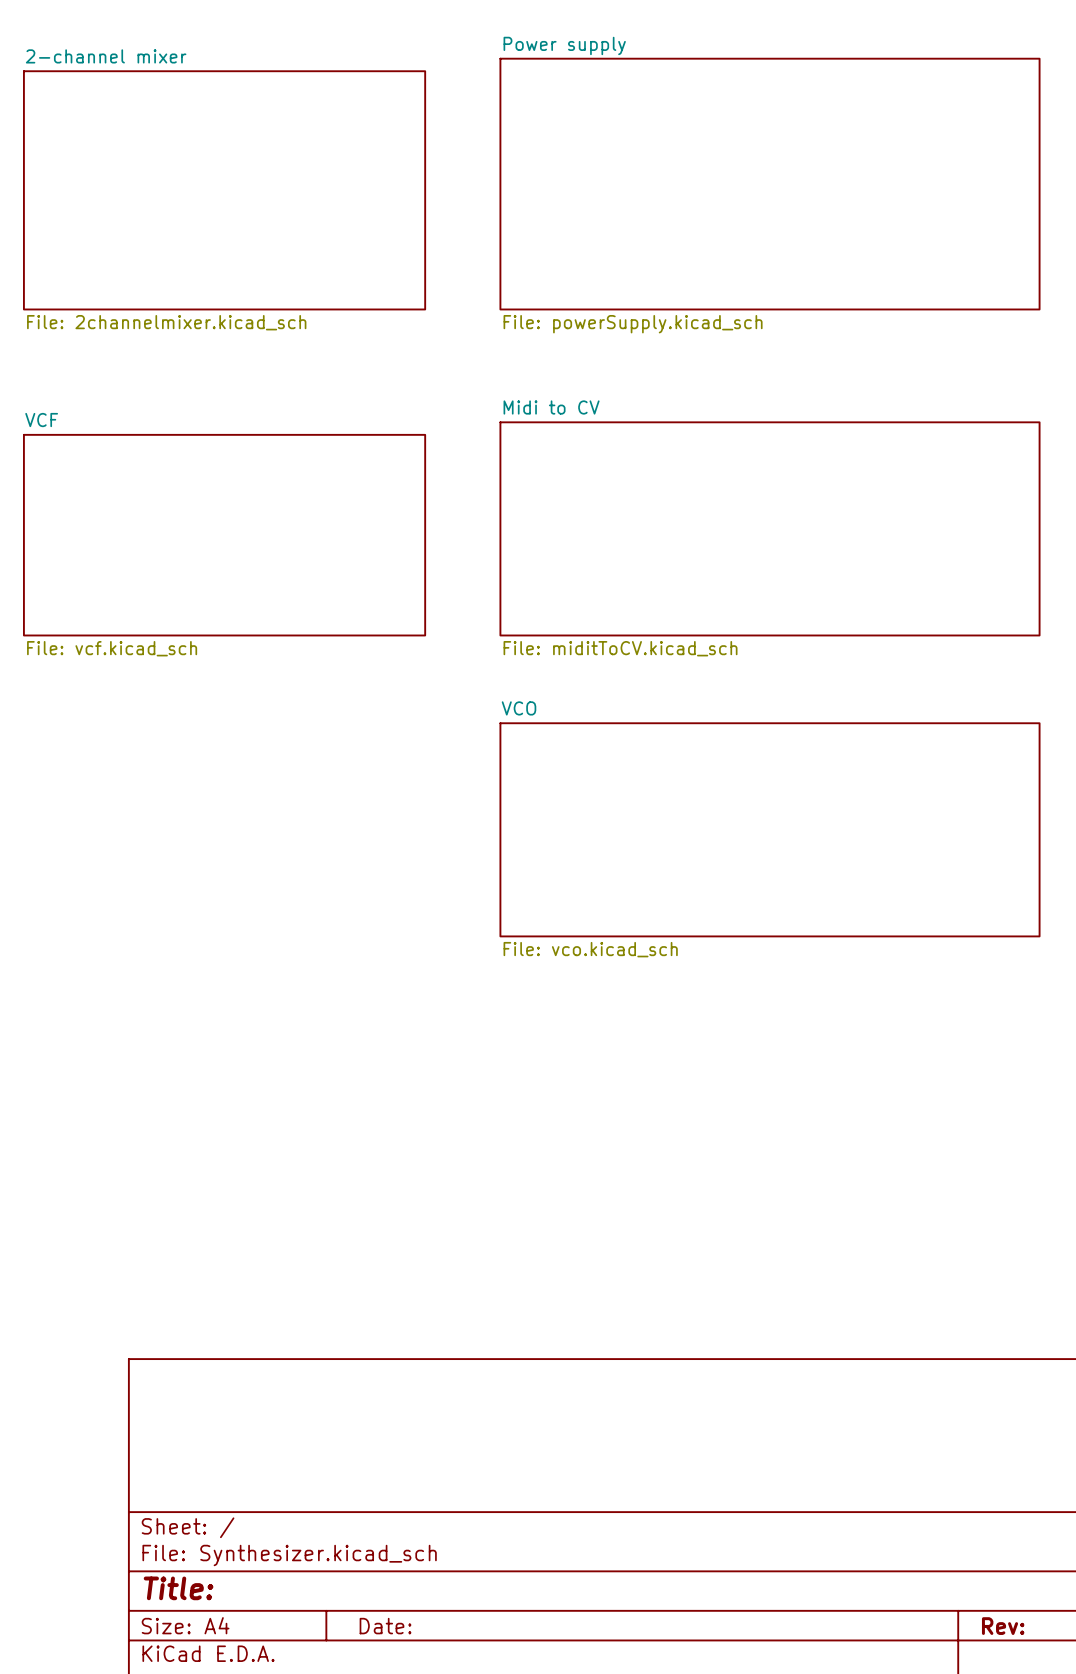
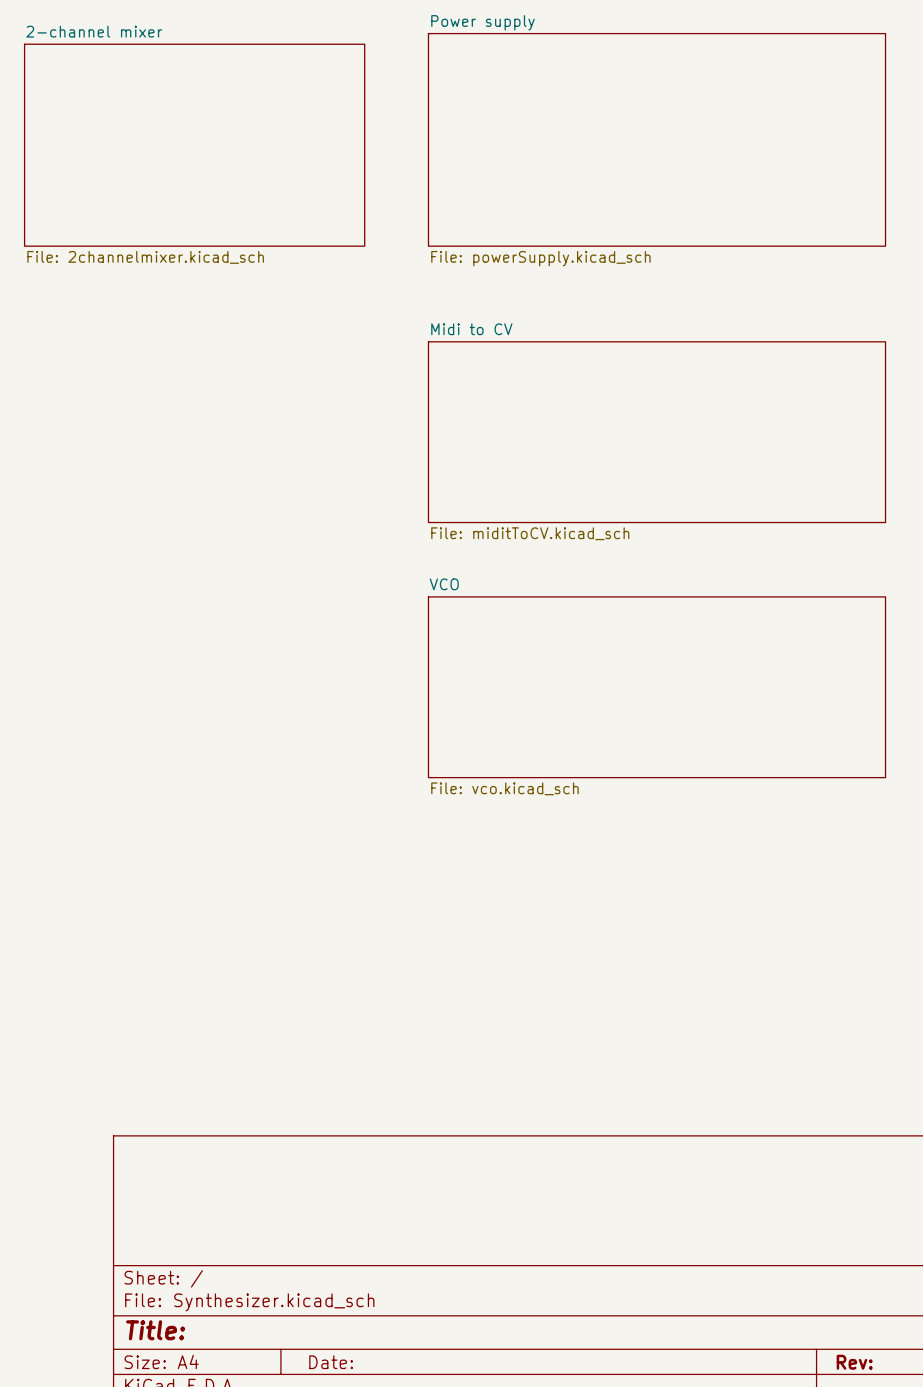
sheet VCF: File: vcf.kicad_sch (224, 535) -> none

